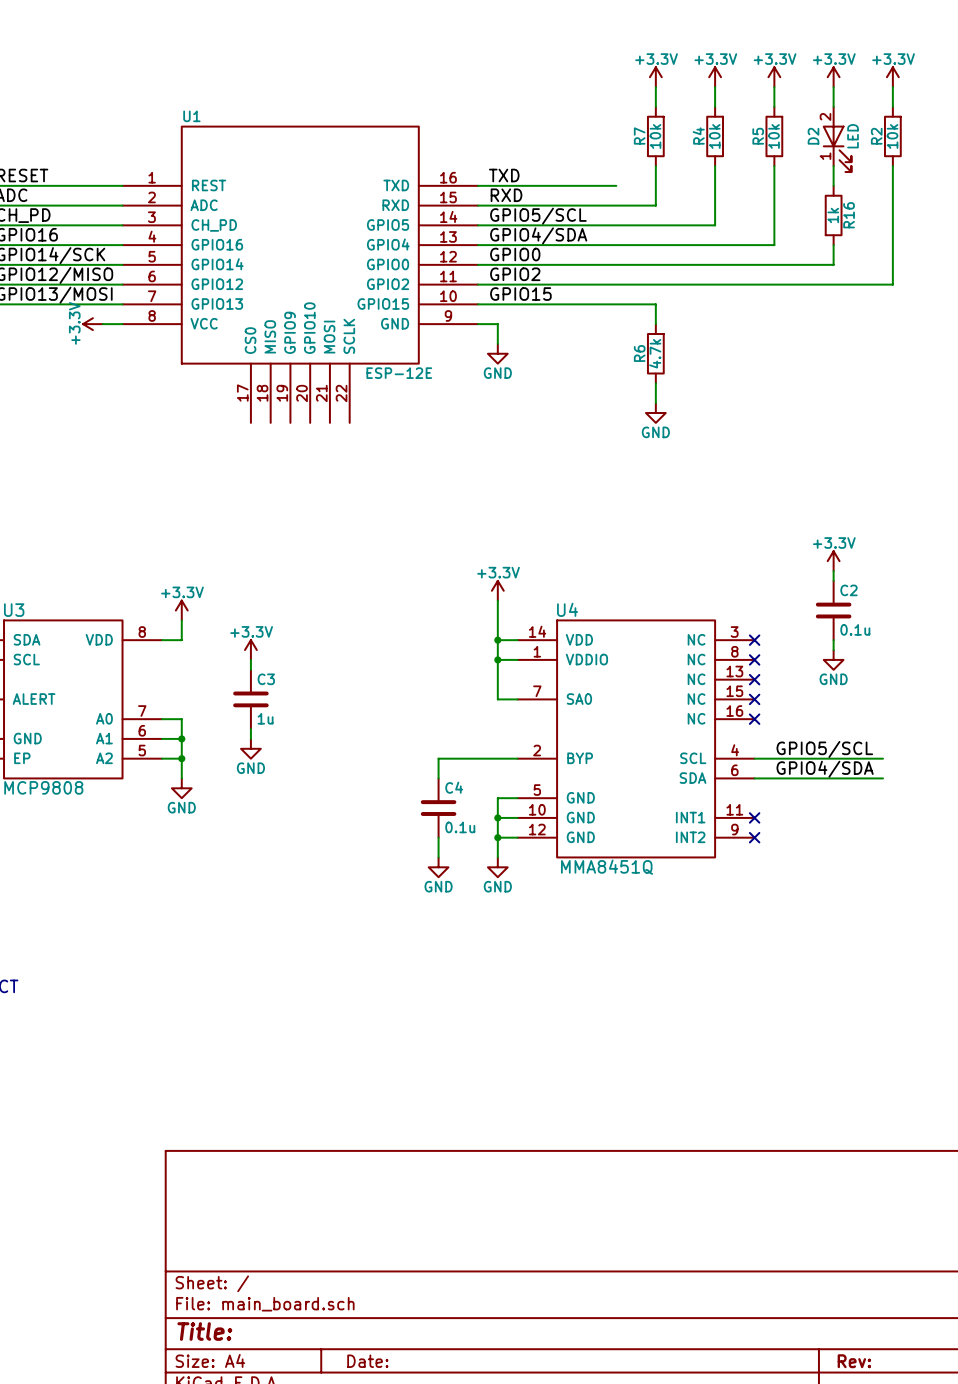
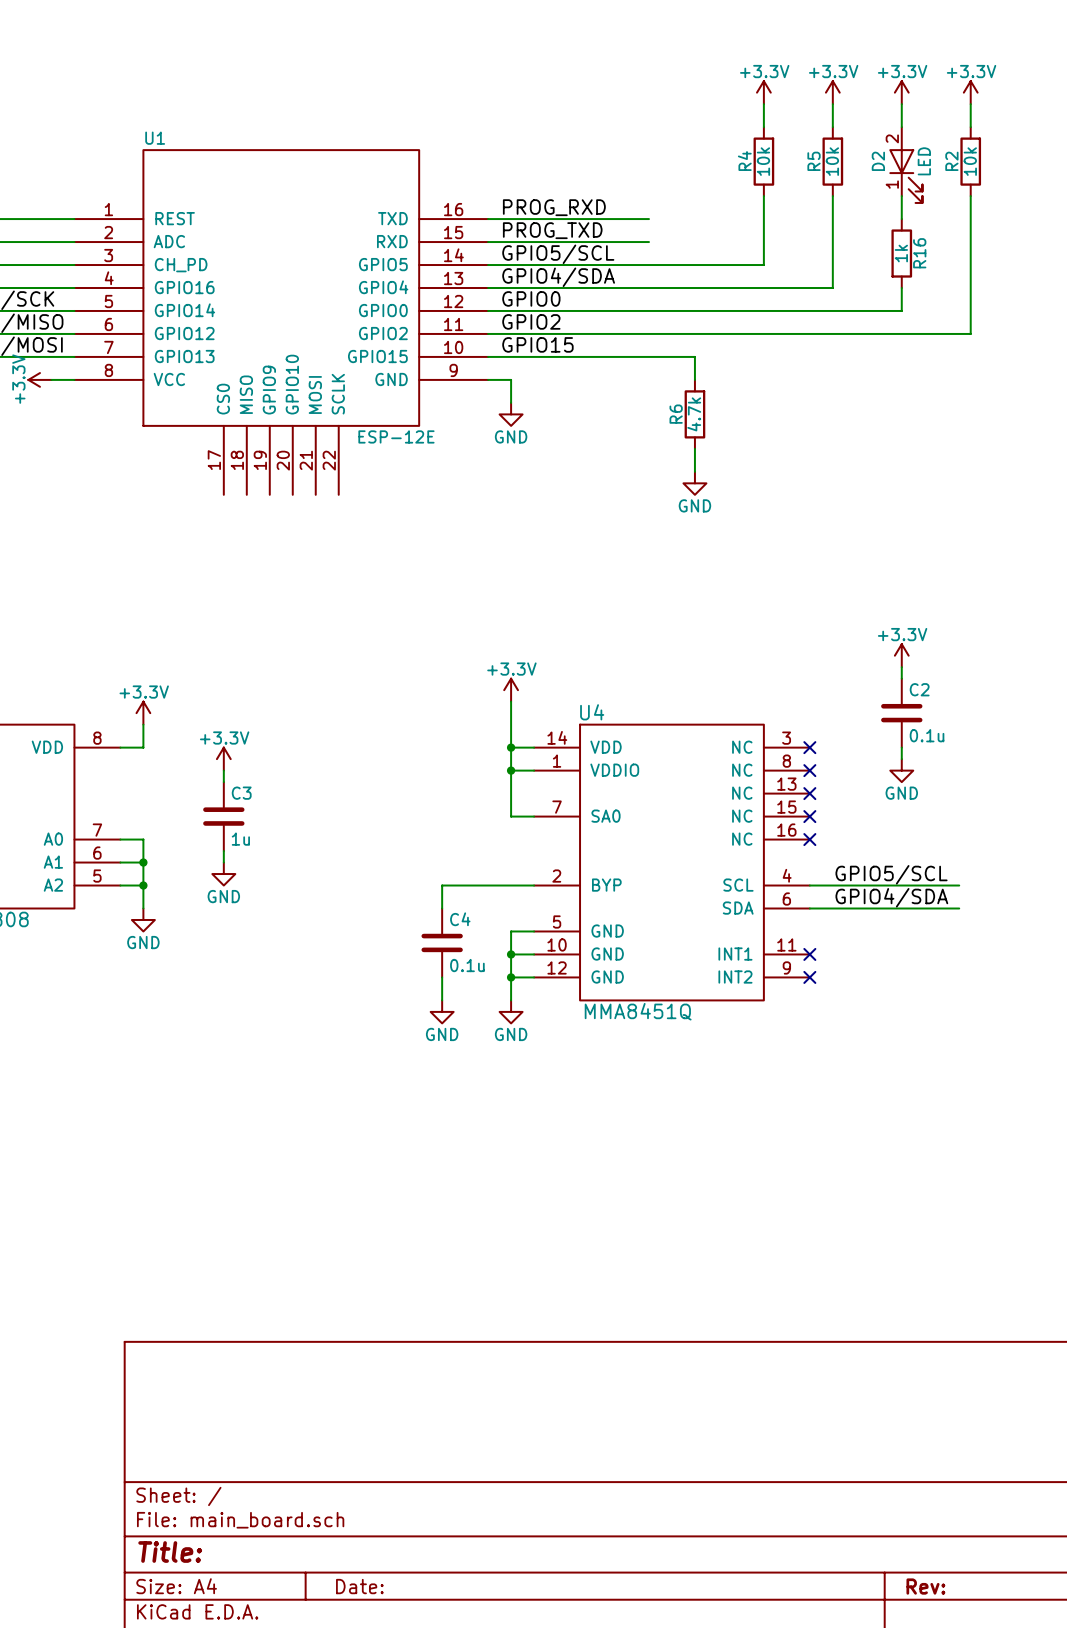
power symbol: +3.3V (655, 77) -> none
wire: (655, 87) (655, 106) -> none
R7: 10k (655, 136) -> none
wire: (655, 166) (655, 205) (616, 205) -> none
label: TXD (504, 175) -> PROG_RXD (554, 207)
label: RXD (506, 195) -> PROG_TXD (552, 230)

